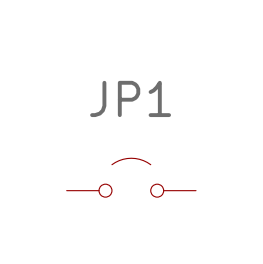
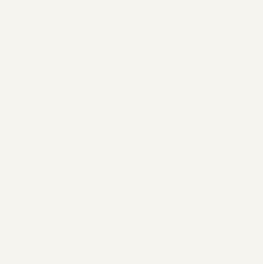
JP1: (131, 177) -> none

